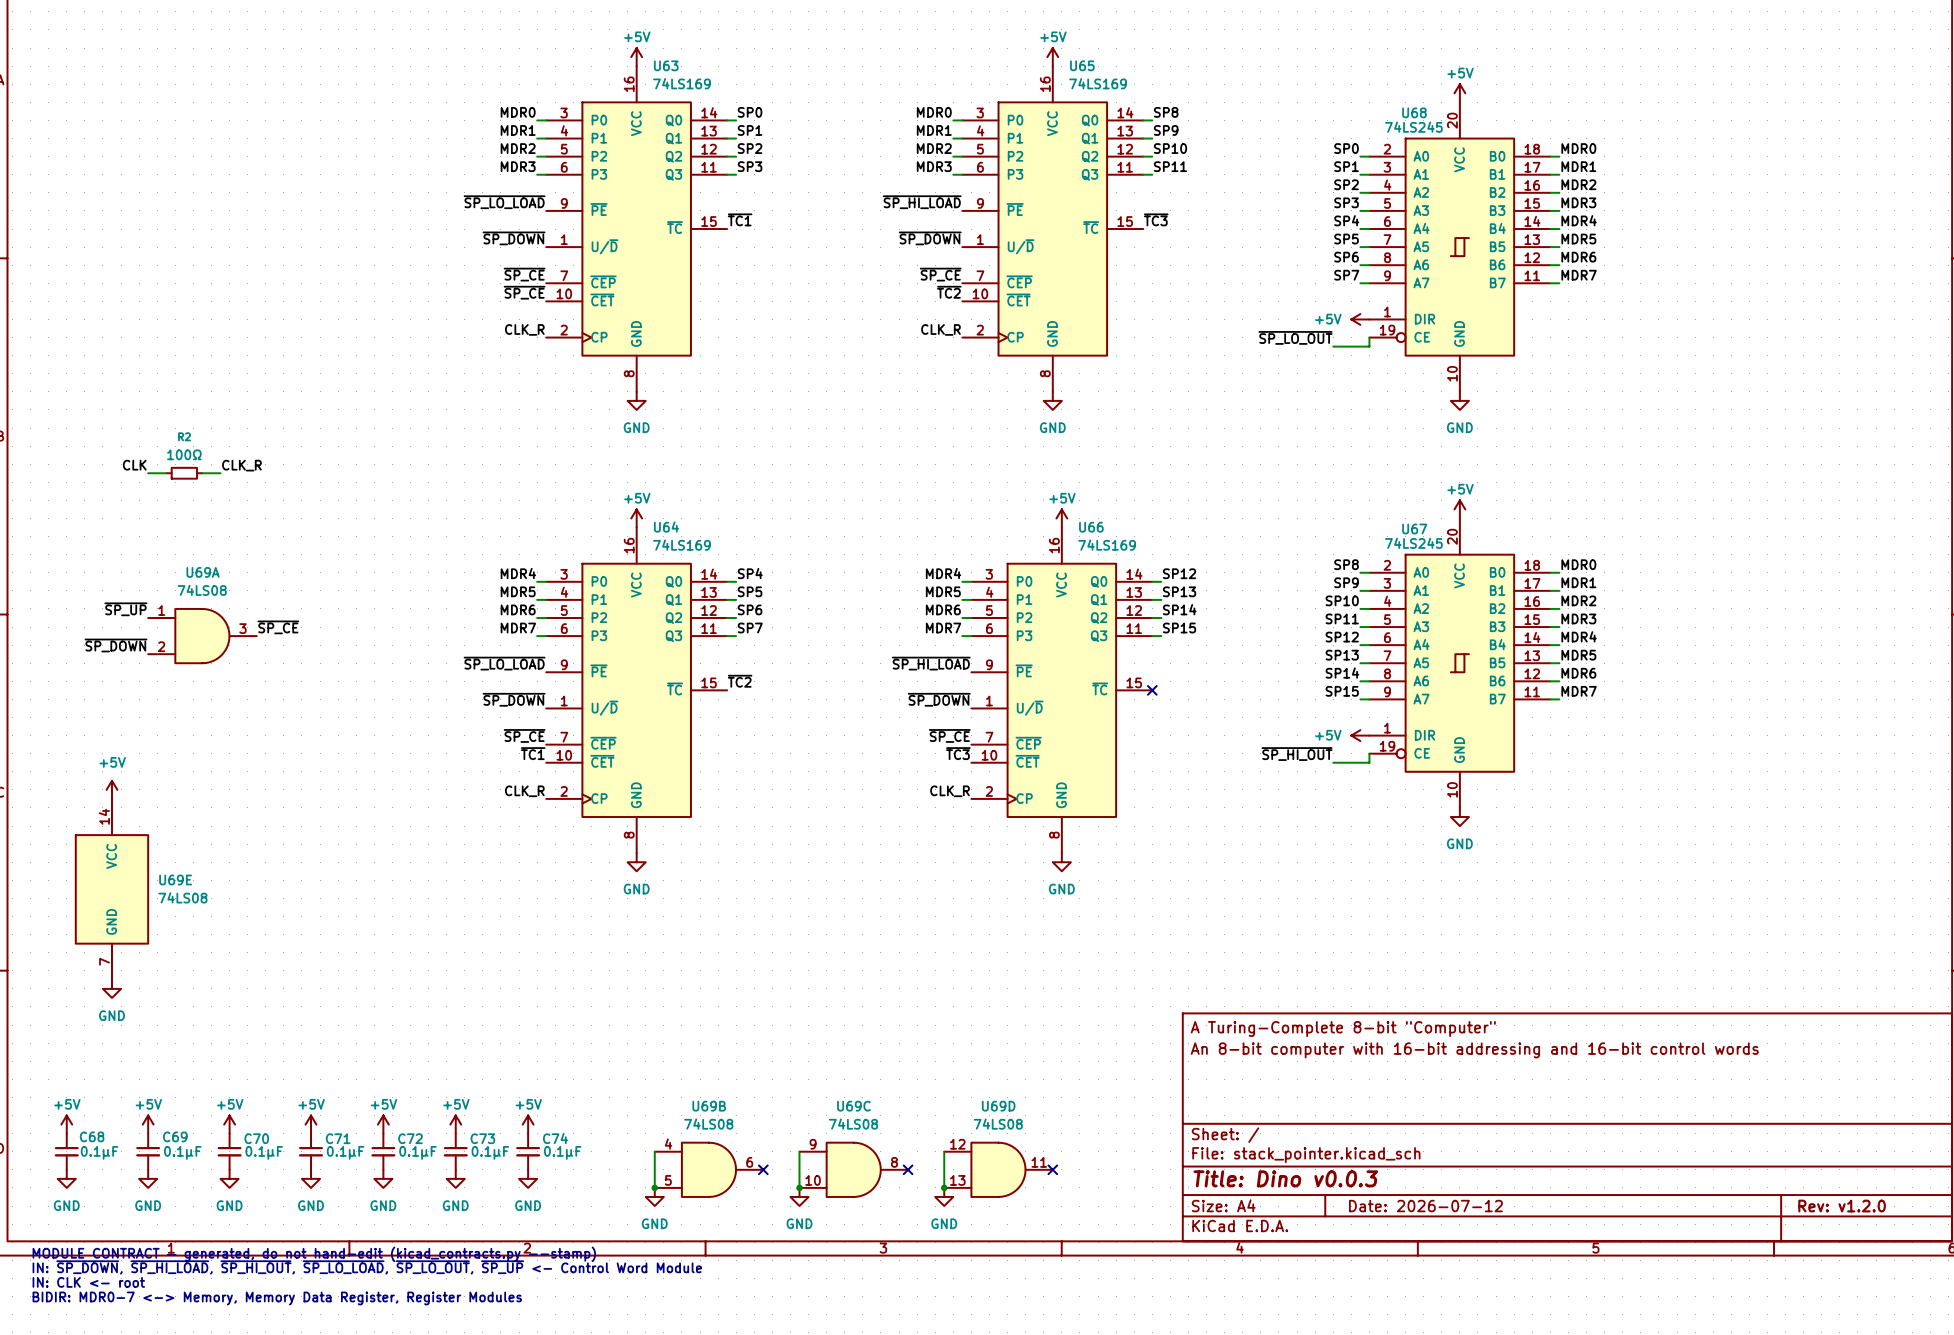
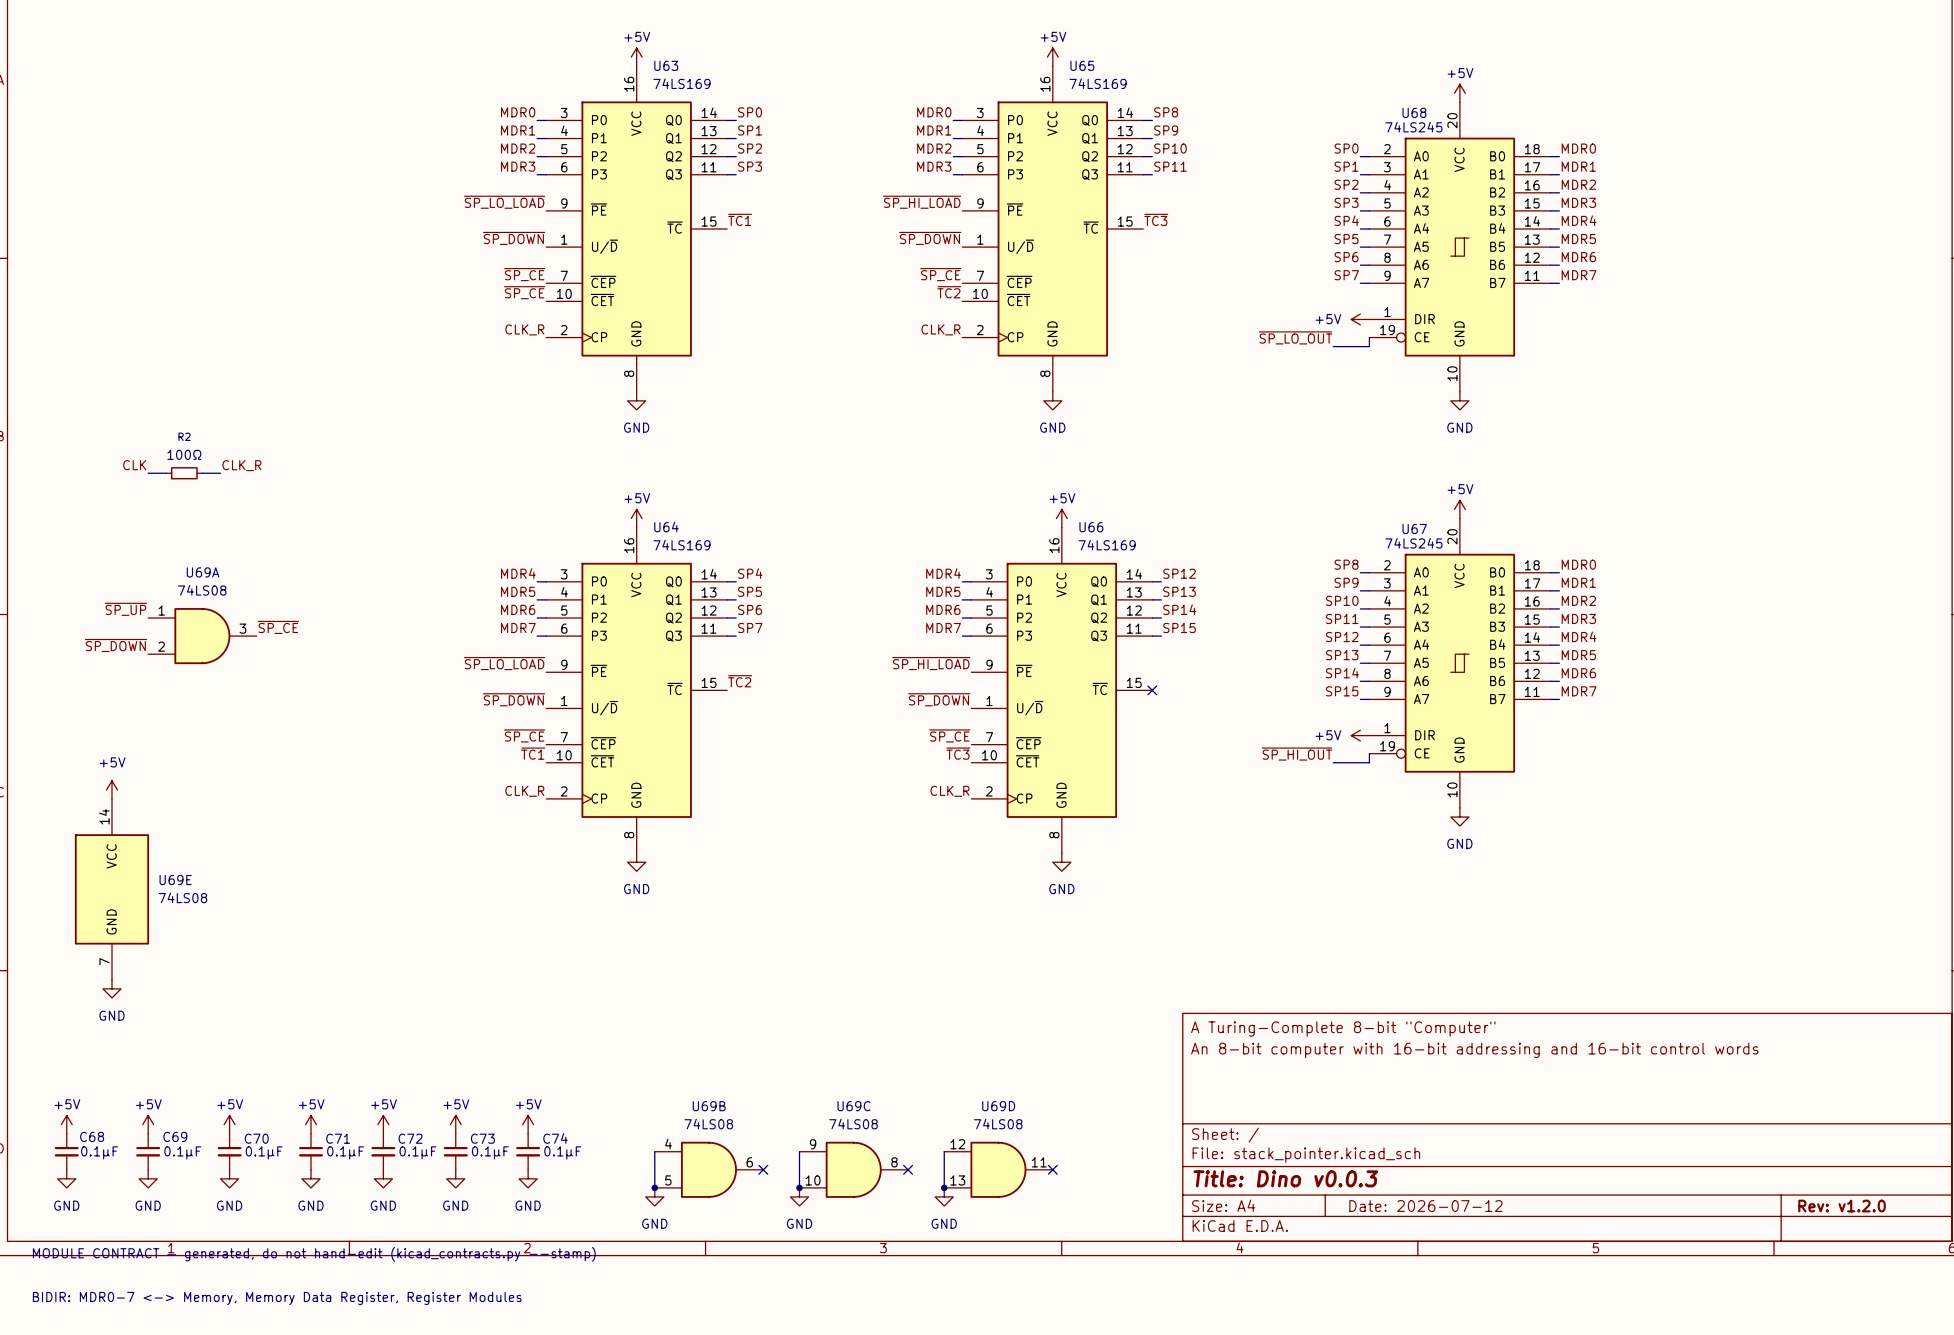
text: IN: ~{SP_DOWN}, ~{SP_HI_LOAD}, ~{SP_HI_OUT}, ~{SP_LO_LOAD}, ~{SP_LO_OUT}, ~{SP_UP} <- Control Word Module (367, 1267) -> none
text: IN: CLK <- root (88, 1282) -> none

